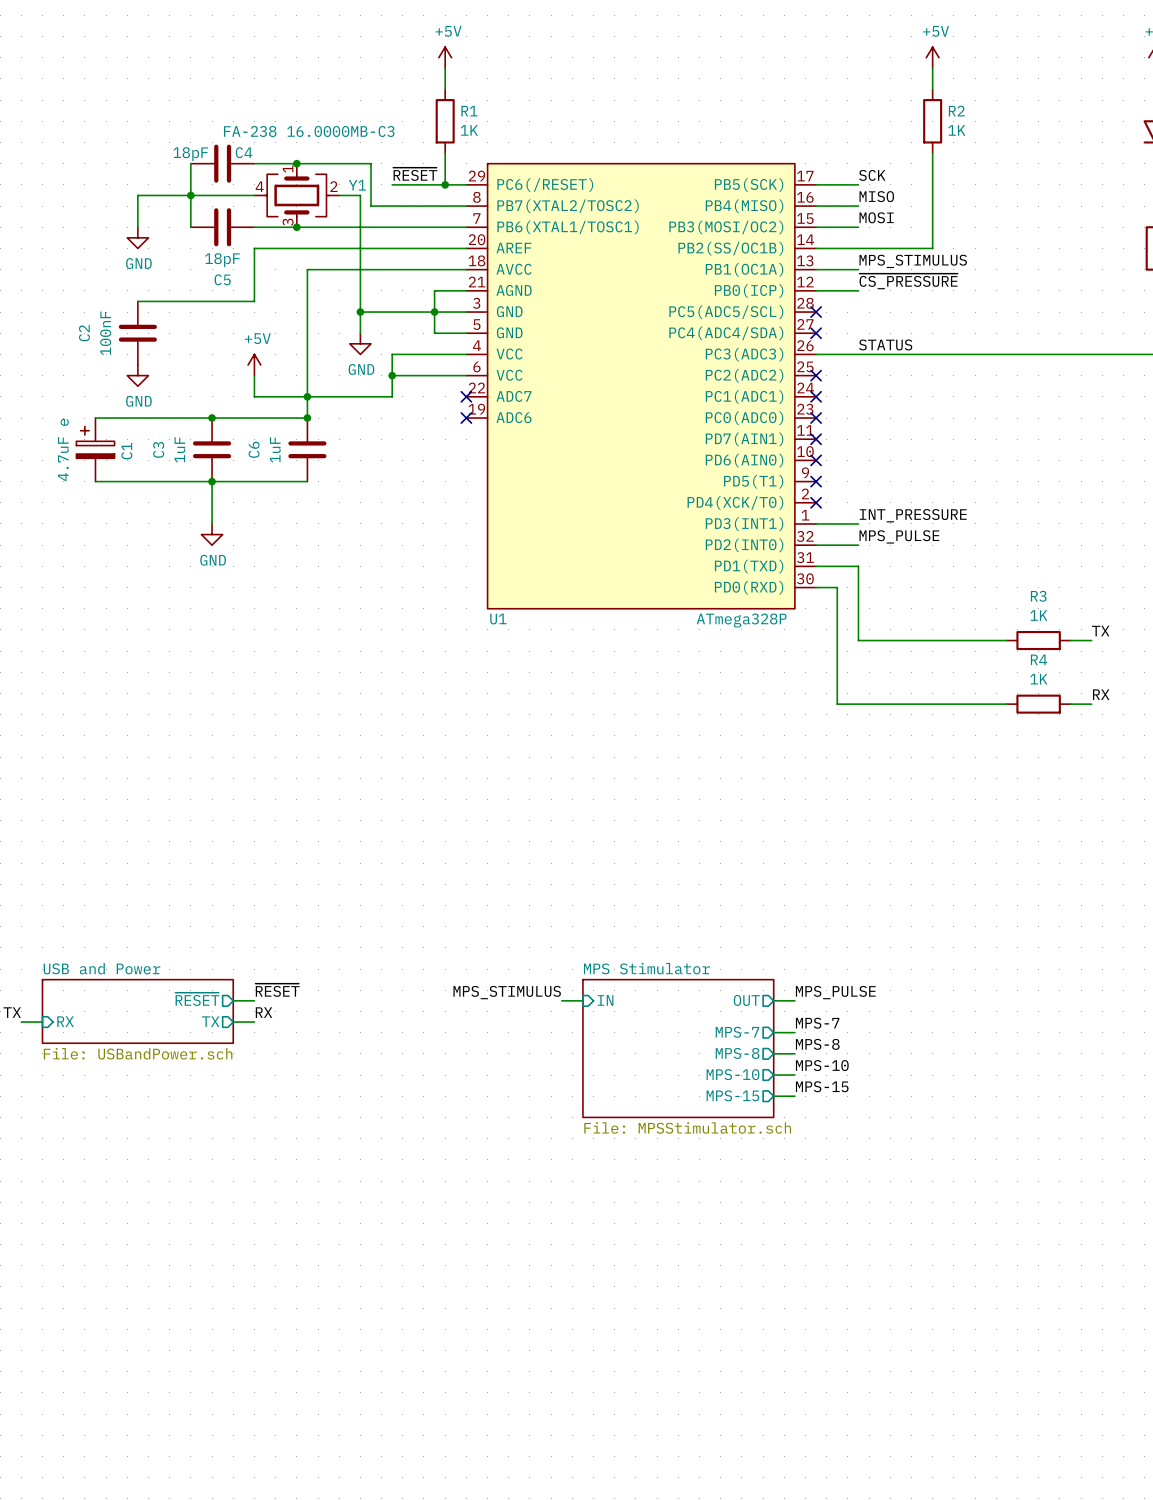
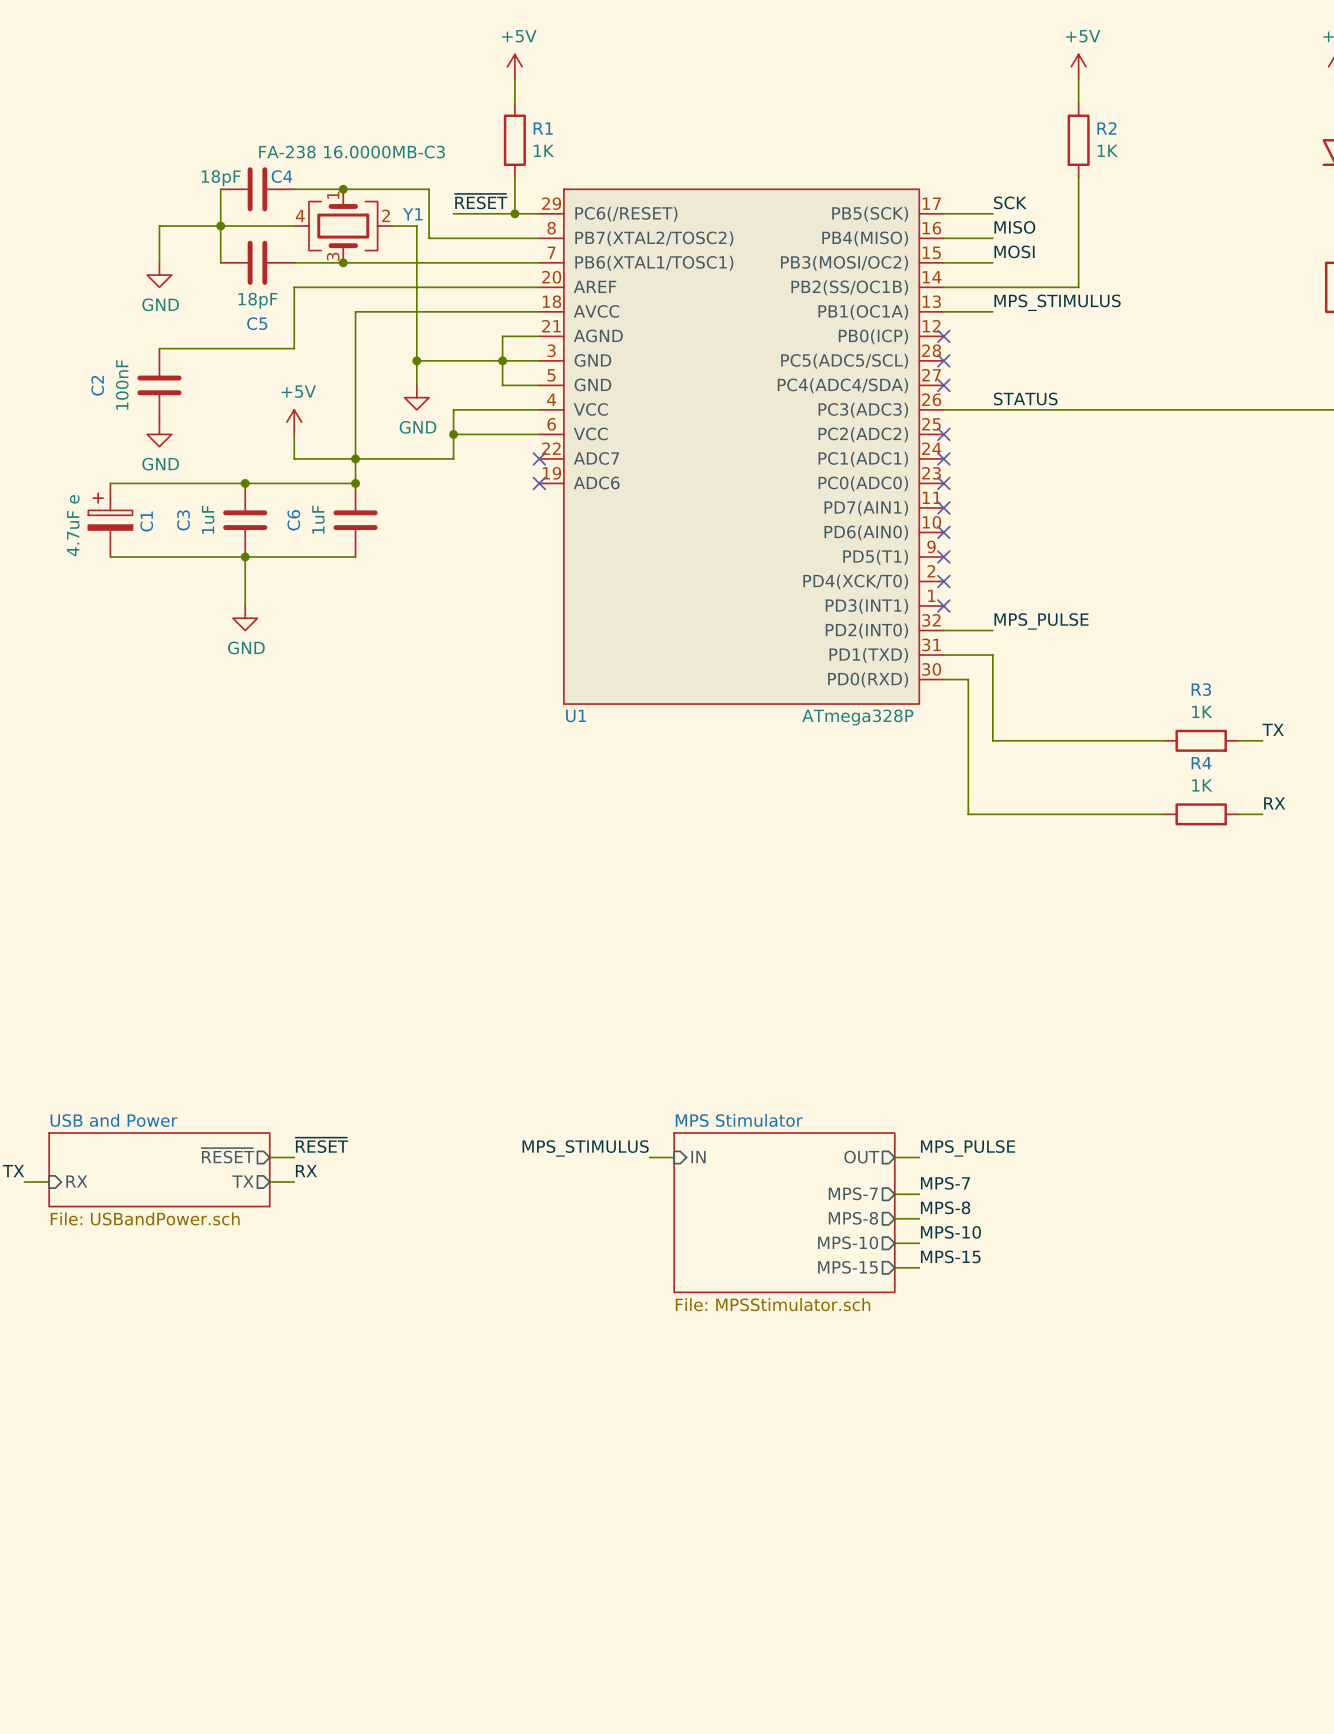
label: ~{CS_PRESSURE} (908, 281) -> none
wire: (816, 290) (858, 290) -> none
no-connect mark: none -> (943, 336)
label: INT_PRESSURE (913, 515) -> none
wire: (816, 523) (858, 523) -> none
no-connect mark: none -> (943, 605)

